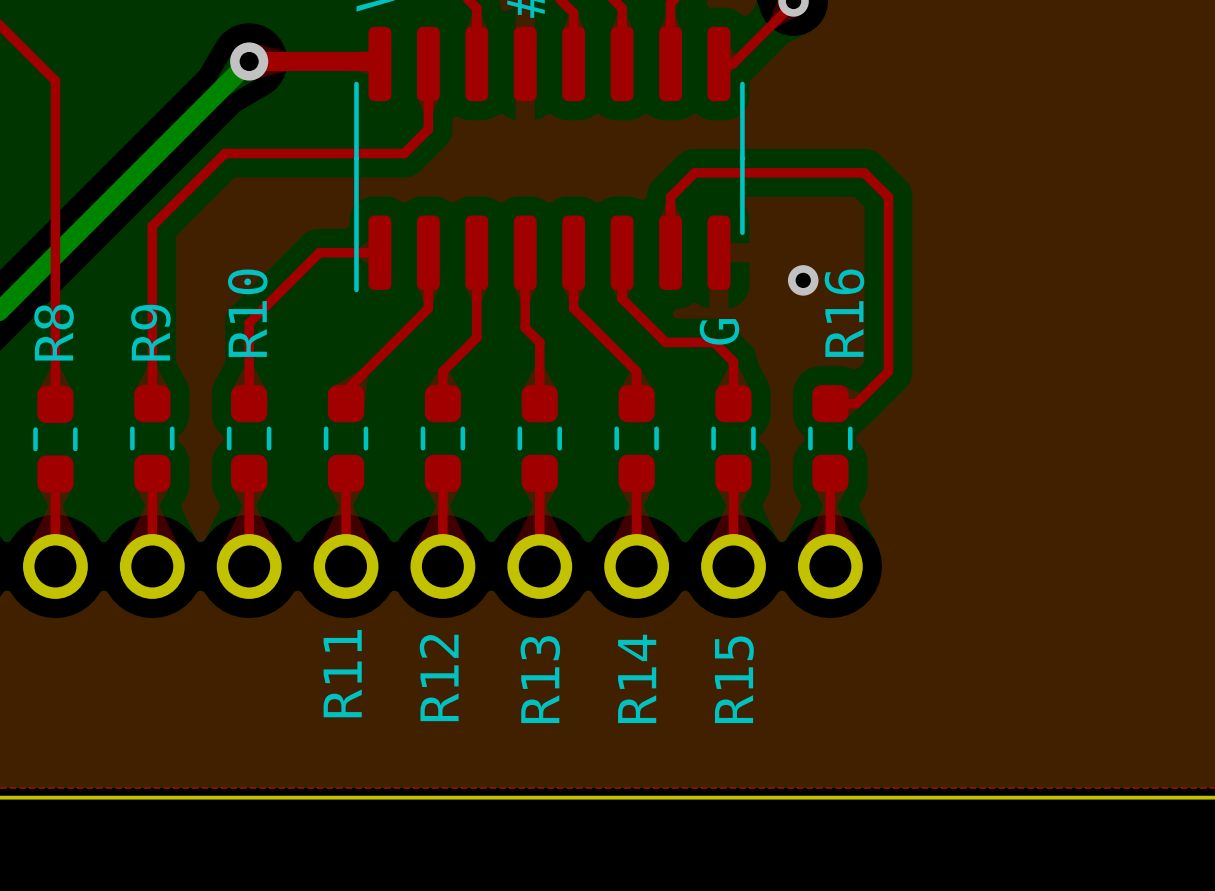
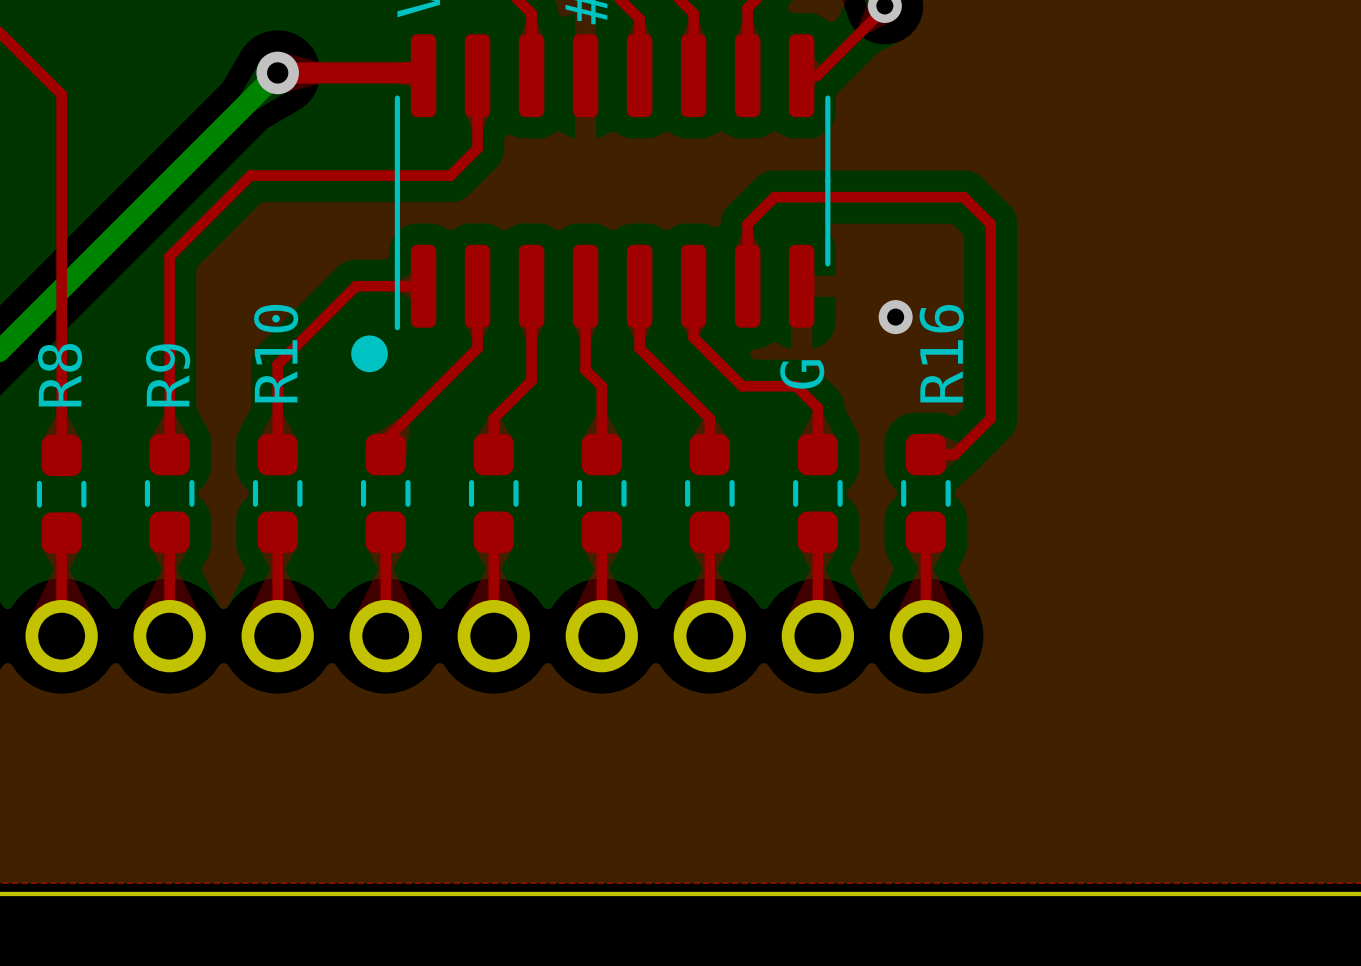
part footprint: [354, 26, 745, 293] -> [351, 34, 831, 373]
R11 name: R11 (342, 673) -> none
R12 name: R12 (439, 677) -> none
R14 name: R14 (637, 678) -> none
R13 name: R13 (540, 679) -> none
R15 name: R15 (734, 679) -> none

